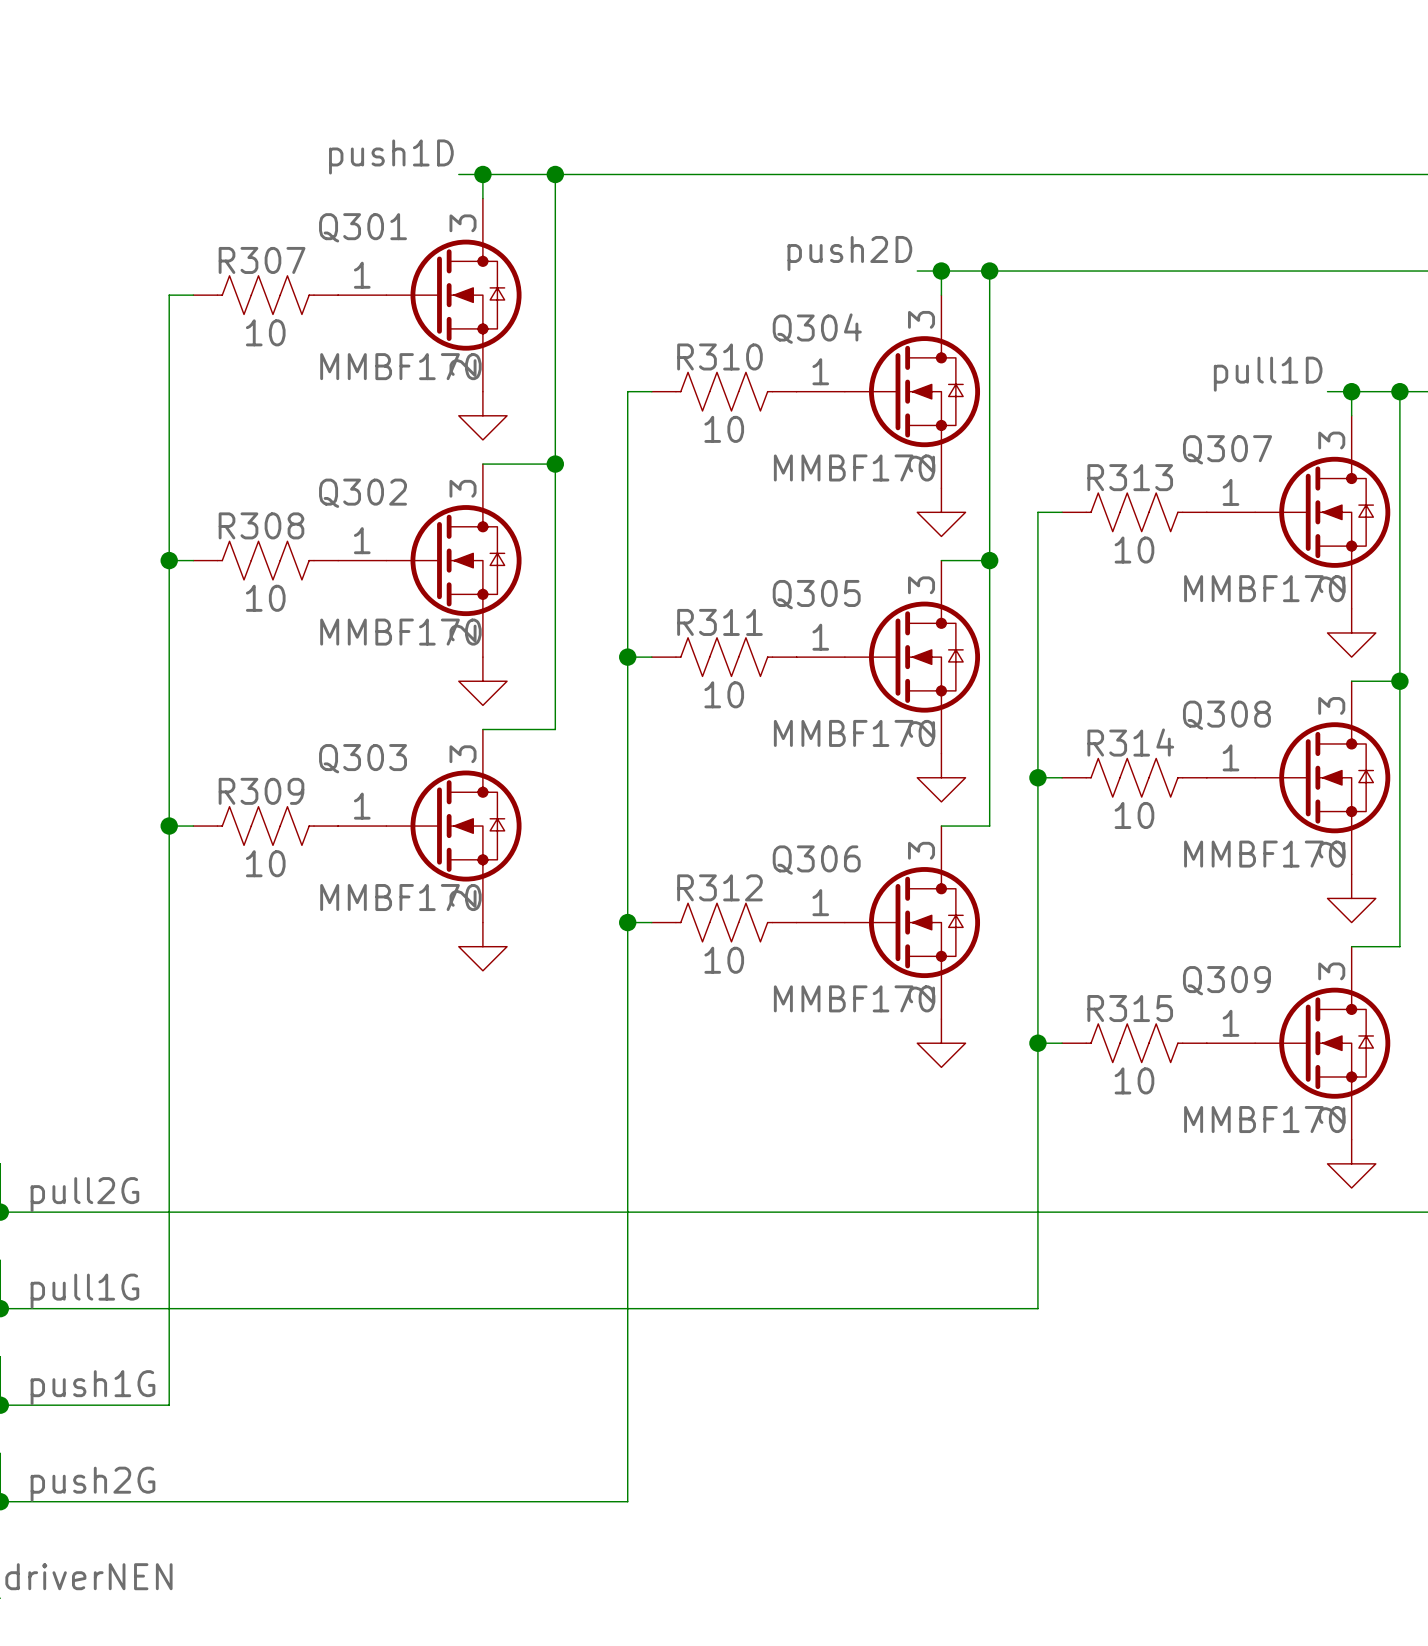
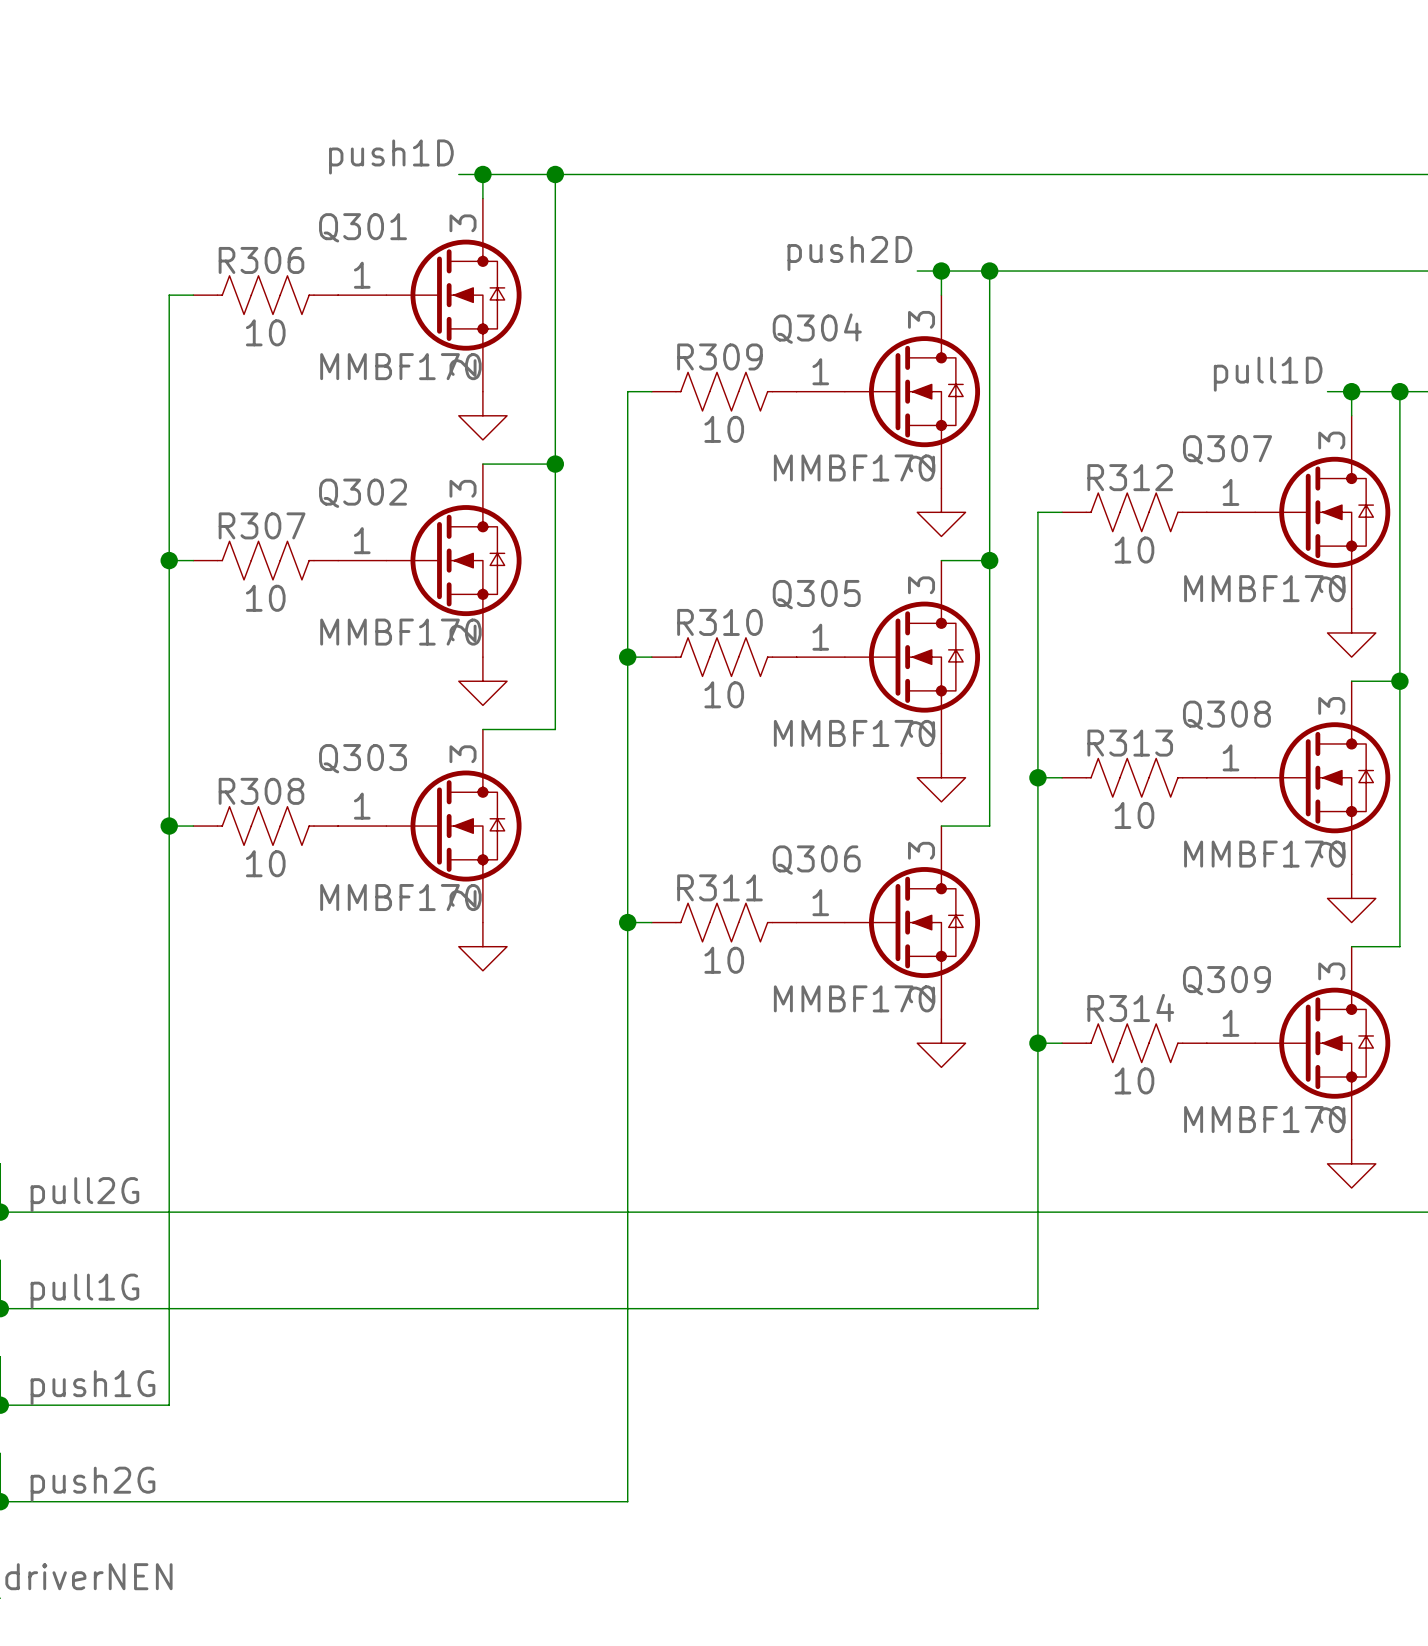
R307 name: R307 (262, 260) -> R306 (261, 260)
R310 name: R310 (719, 356) -> R309 (719, 356)
R313 name: R313 (1130, 477) -> R312 (1130, 477)
R308 name: R308 (261, 525) -> R307 (262, 525)
R311 name: R311 (719, 622) -> R310 (719, 622)
R314 name: R314 (1130, 742) -> R313 (1130, 743)
R309 name: R309 (261, 791) -> R308 (261, 791)
R312 name: R312 (719, 887) -> R311 (719, 887)
R315 name: R315 (1130, 1008) -> R314 (1130, 1007)

